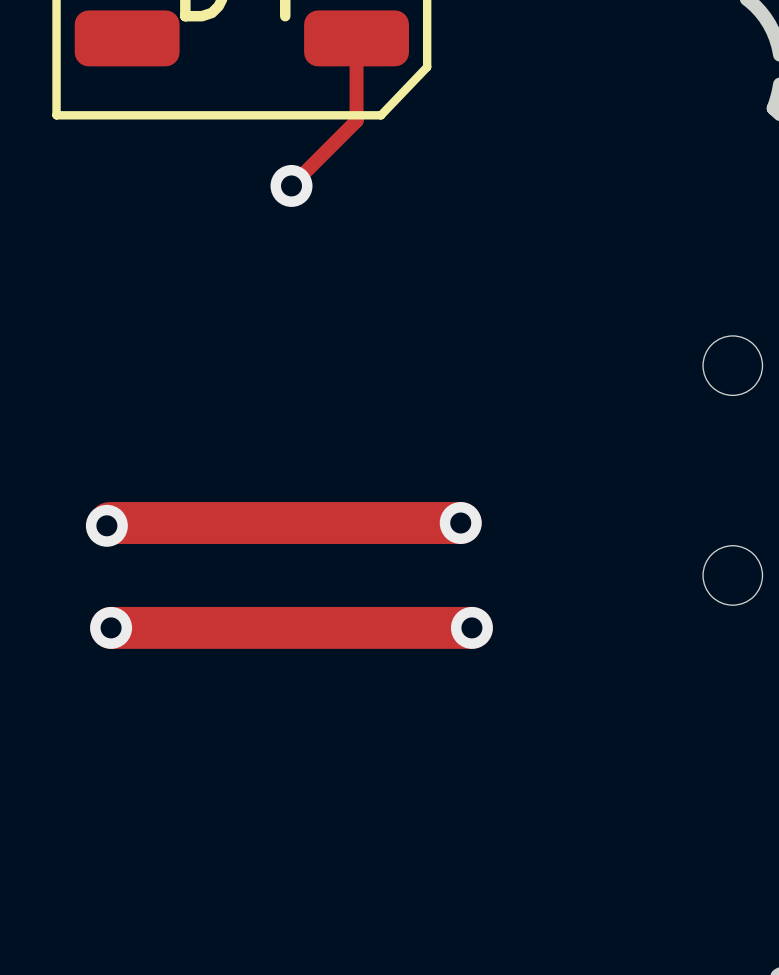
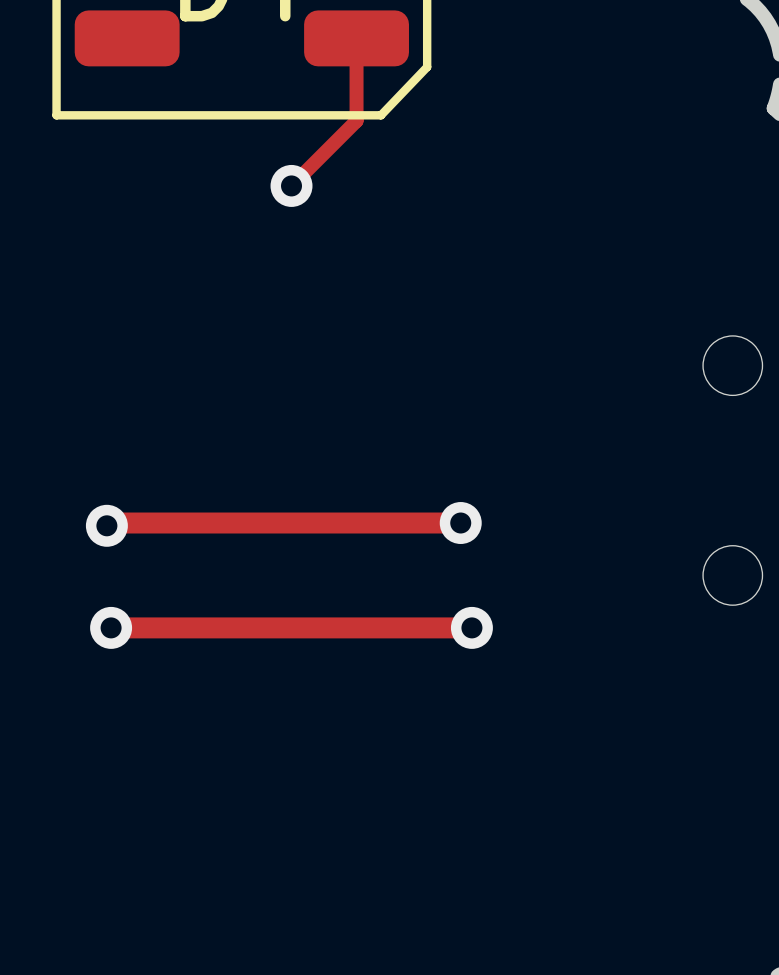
track width: thick (109, 523) (460, 523) -> thin (109, 523) (460, 523)
track width: thick (111, 627) (471, 627) -> thin (111, 627) (471, 627)

